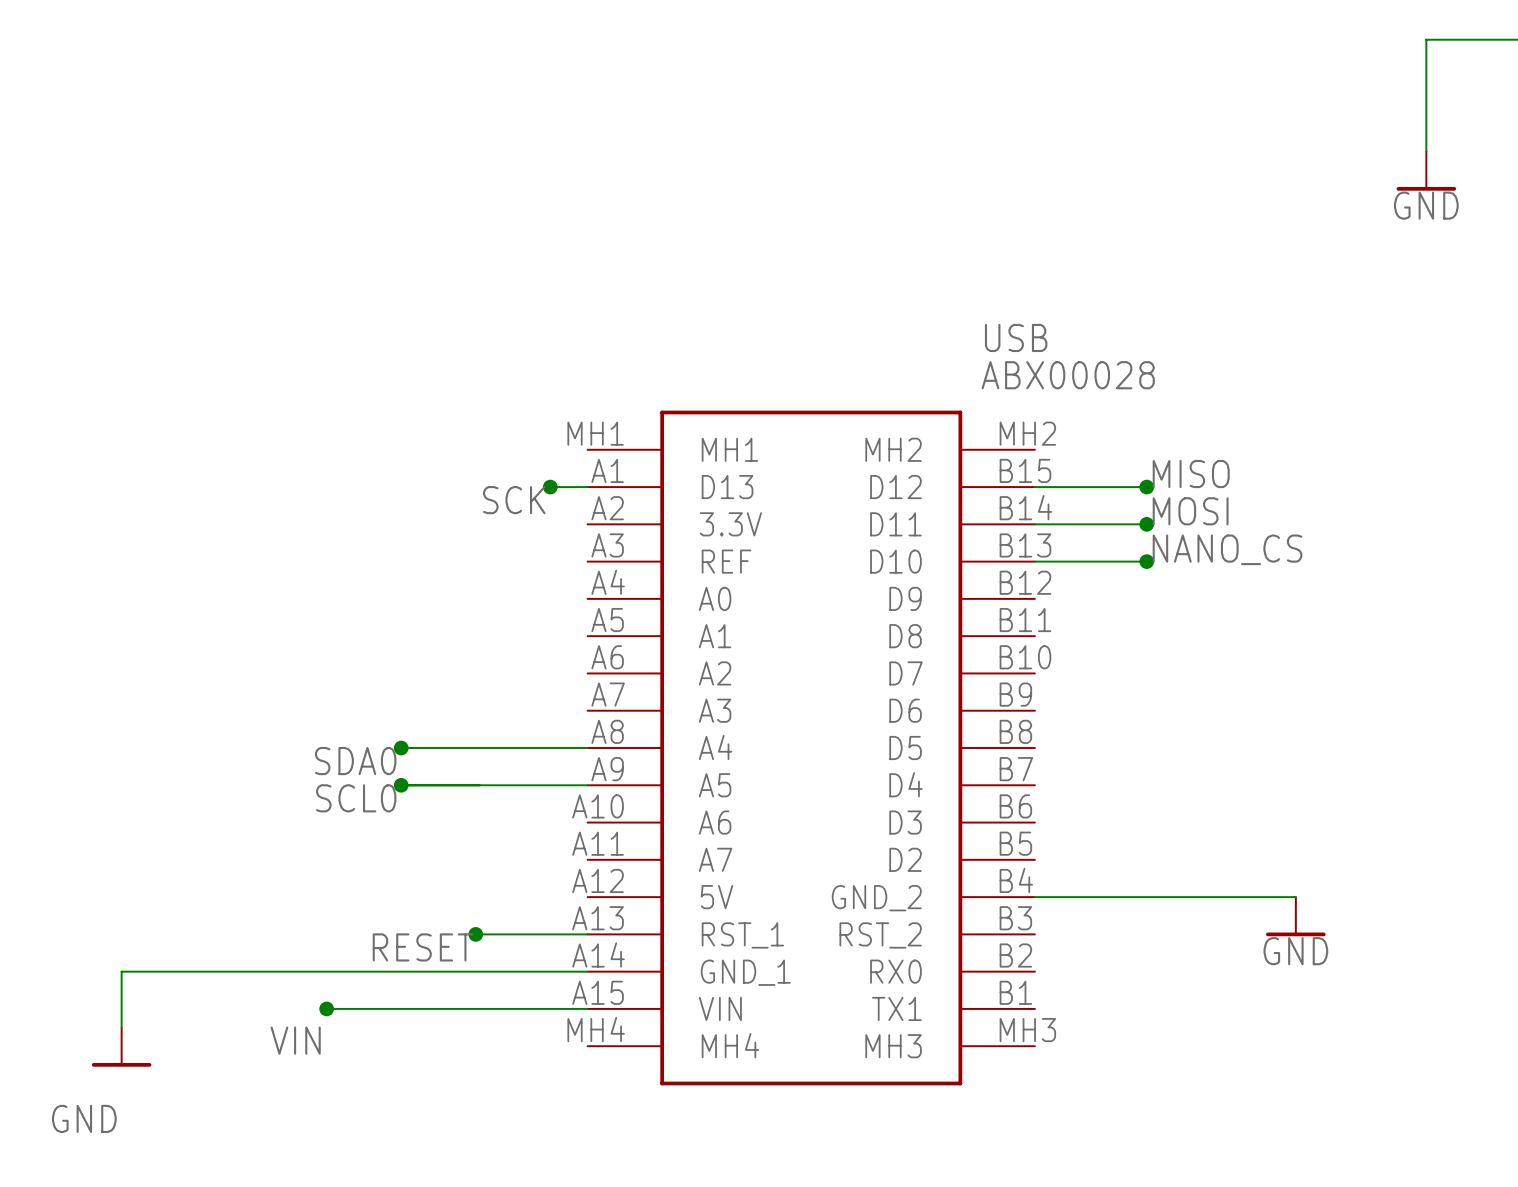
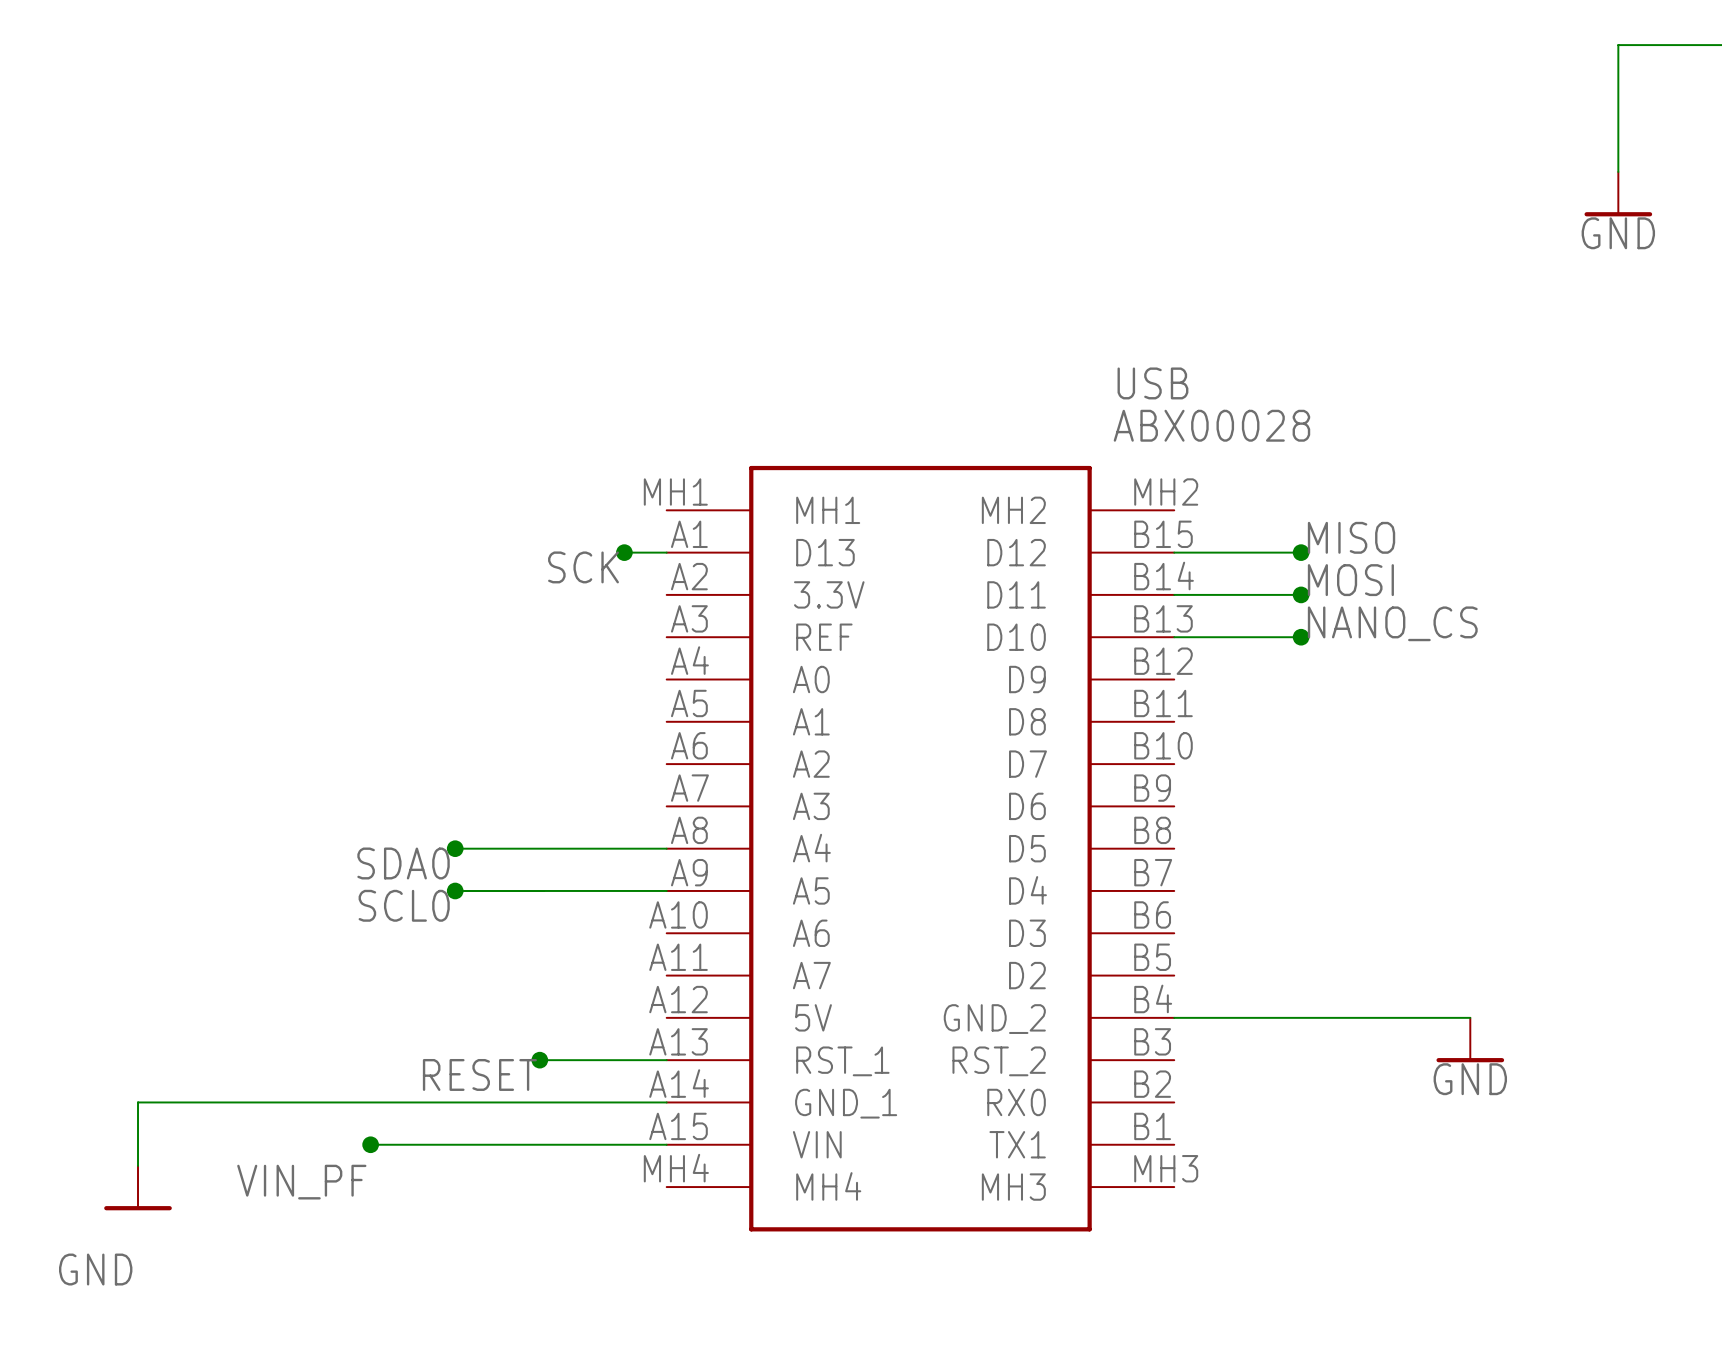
label: VIN (295, 1040) -> VIN_PF (301, 1182)

